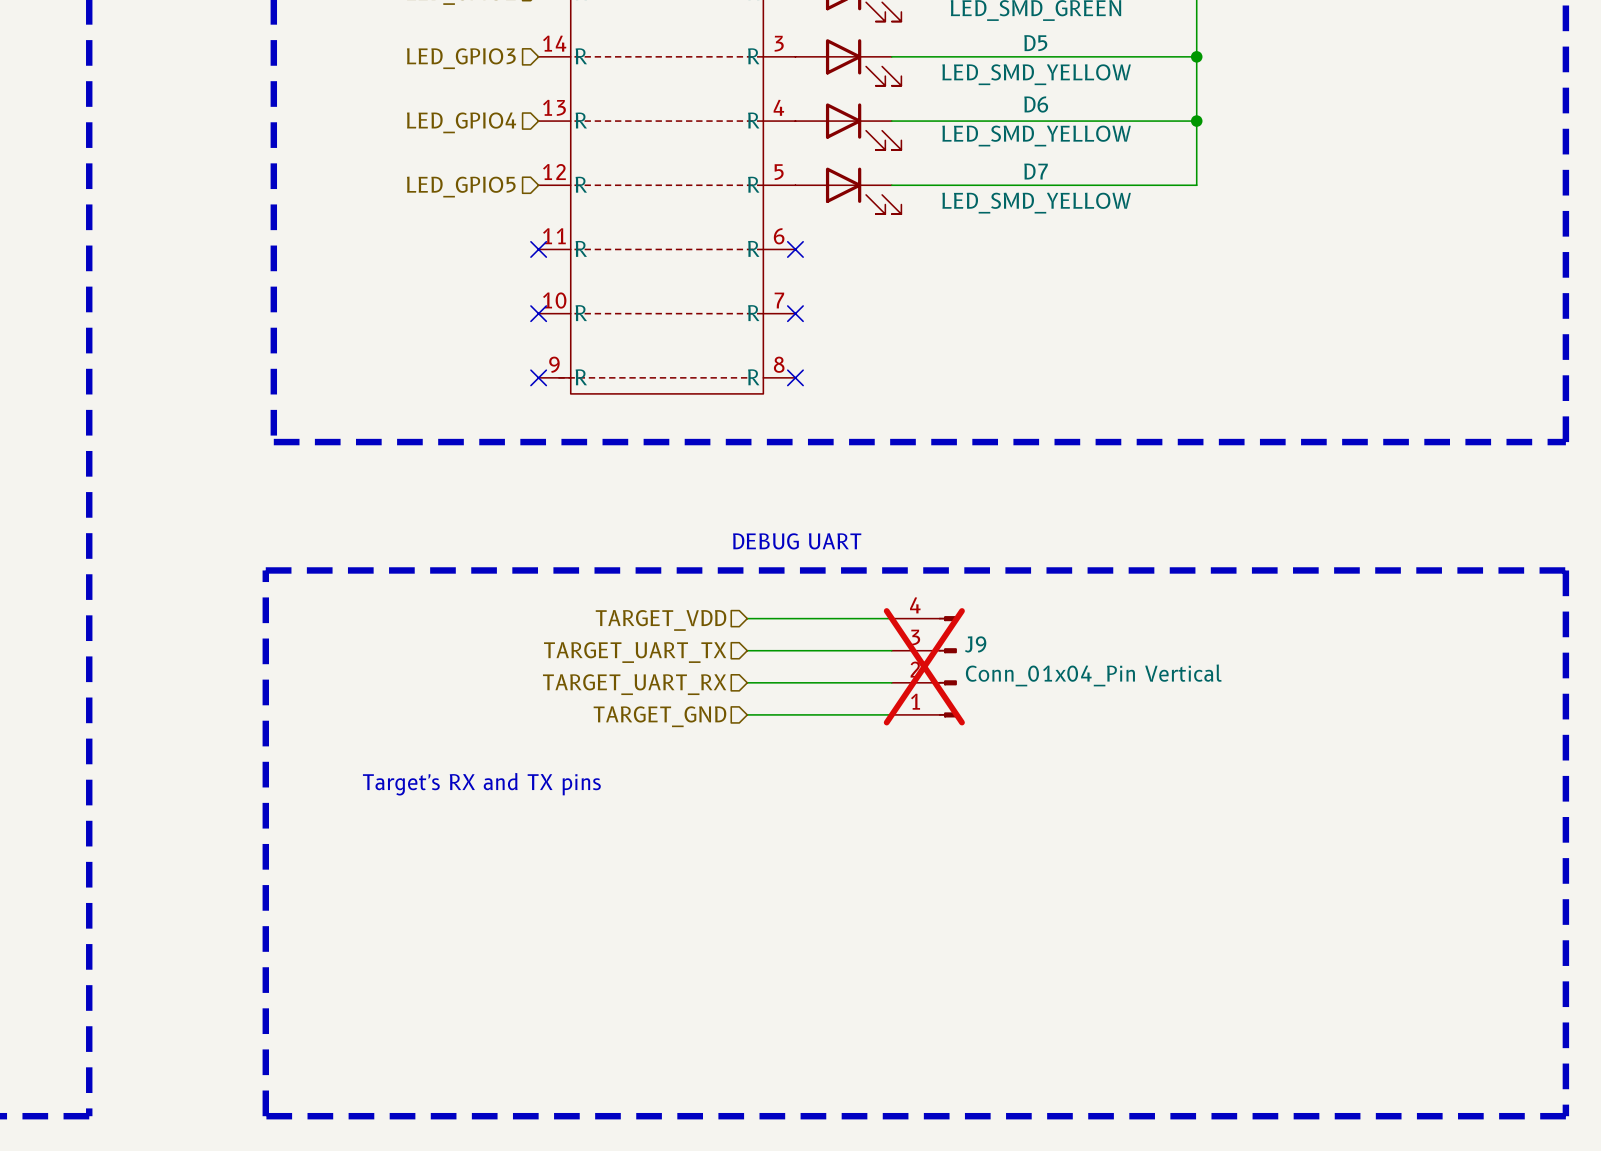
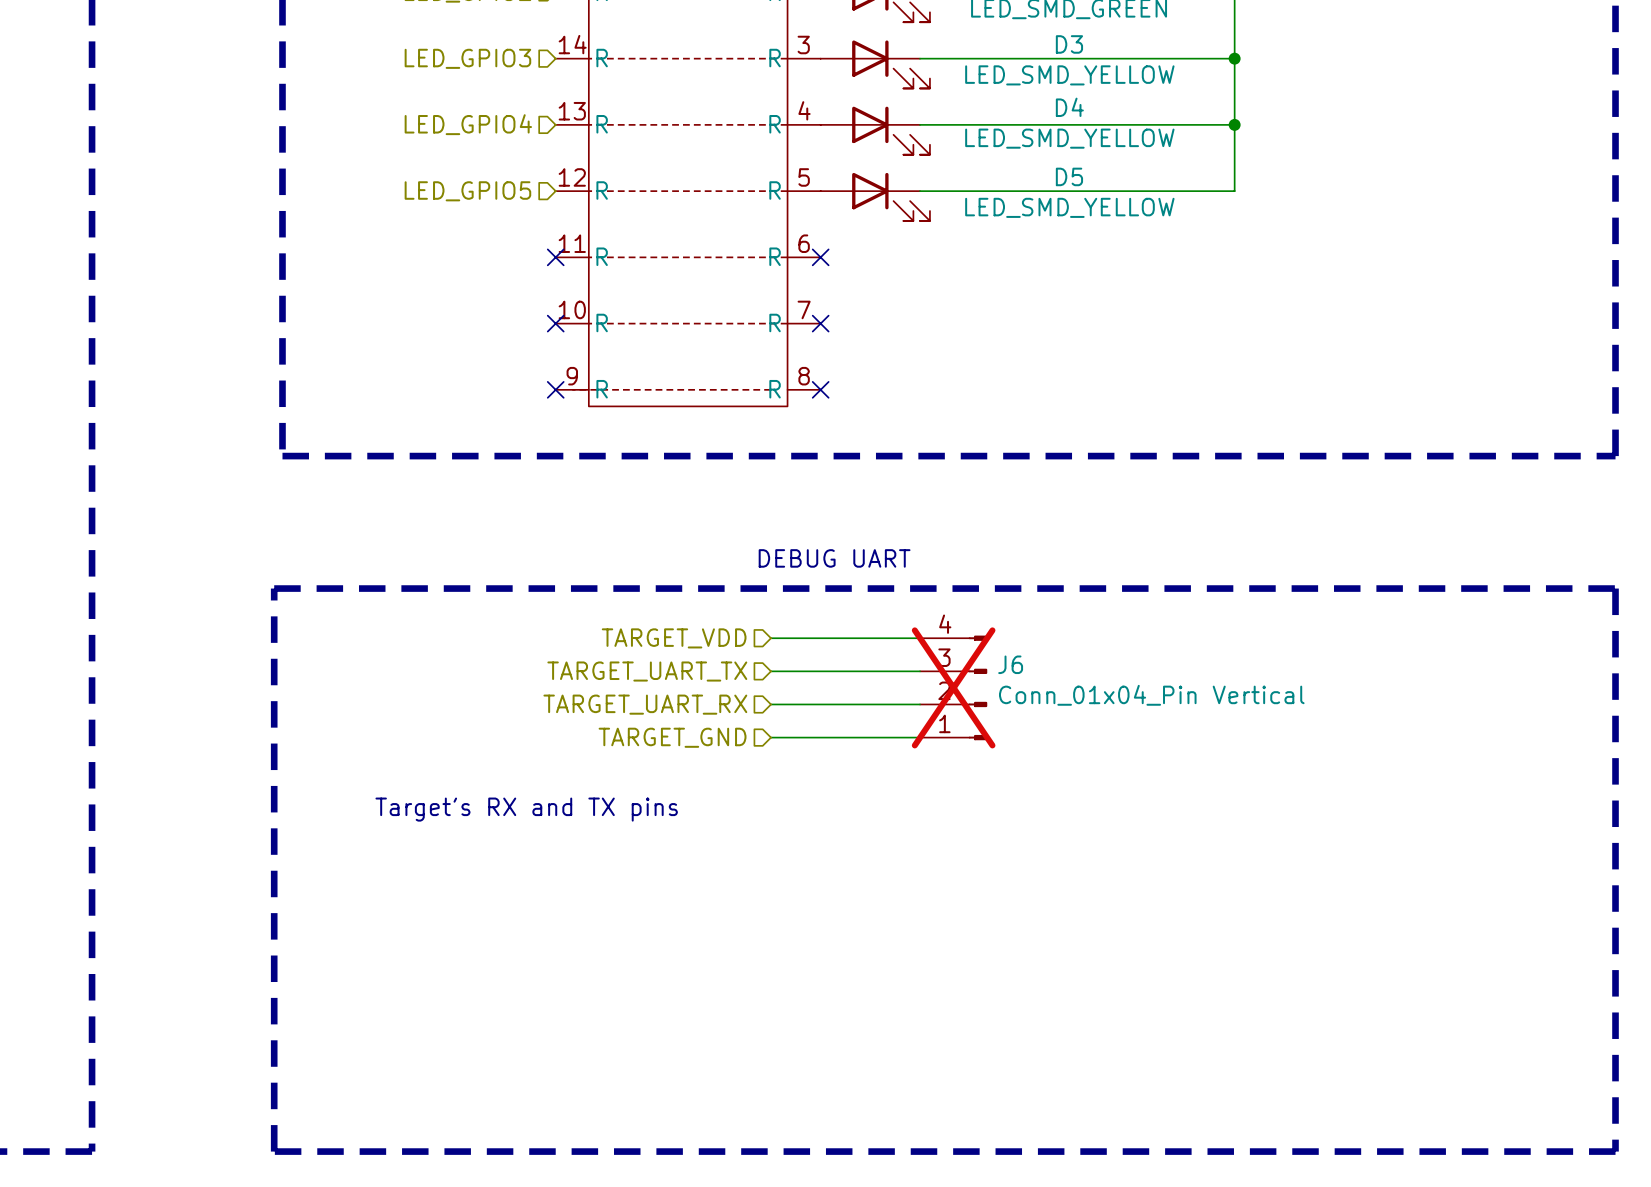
D5 name: D5 (1035, 43) -> D3 (1069, 44)
D6 name: D6 (1036, 104) -> D4 (1069, 107)
D7 name: D7 (1036, 171) -> D5 (1069, 176)
J9 name: J9 (975, 644) -> J6 (1010, 664)

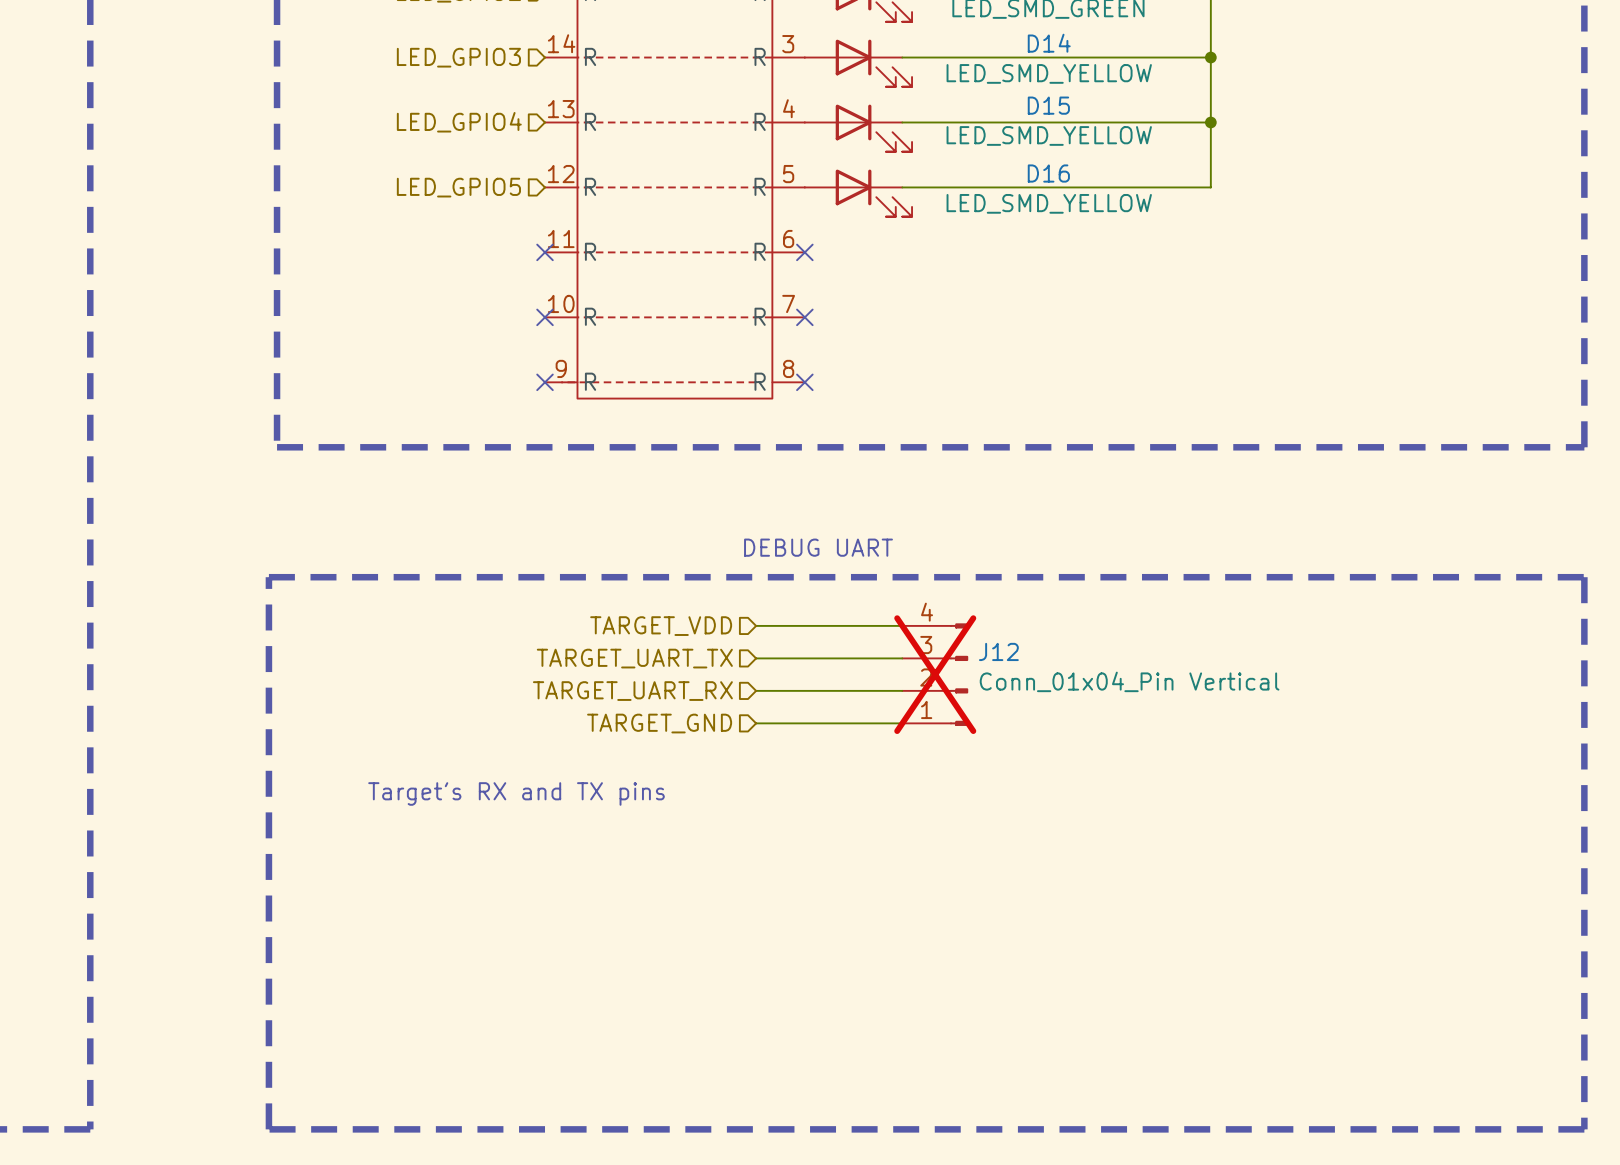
D3 name: D3 (1069, 44) -> D14 (1049, 43)
D4 name: D4 (1069, 107) -> D15 (1048, 105)
D5 name: D5 (1069, 176) -> D16 (1048, 173)
J6 name: J6 (1010, 664) -> J12 (998, 651)

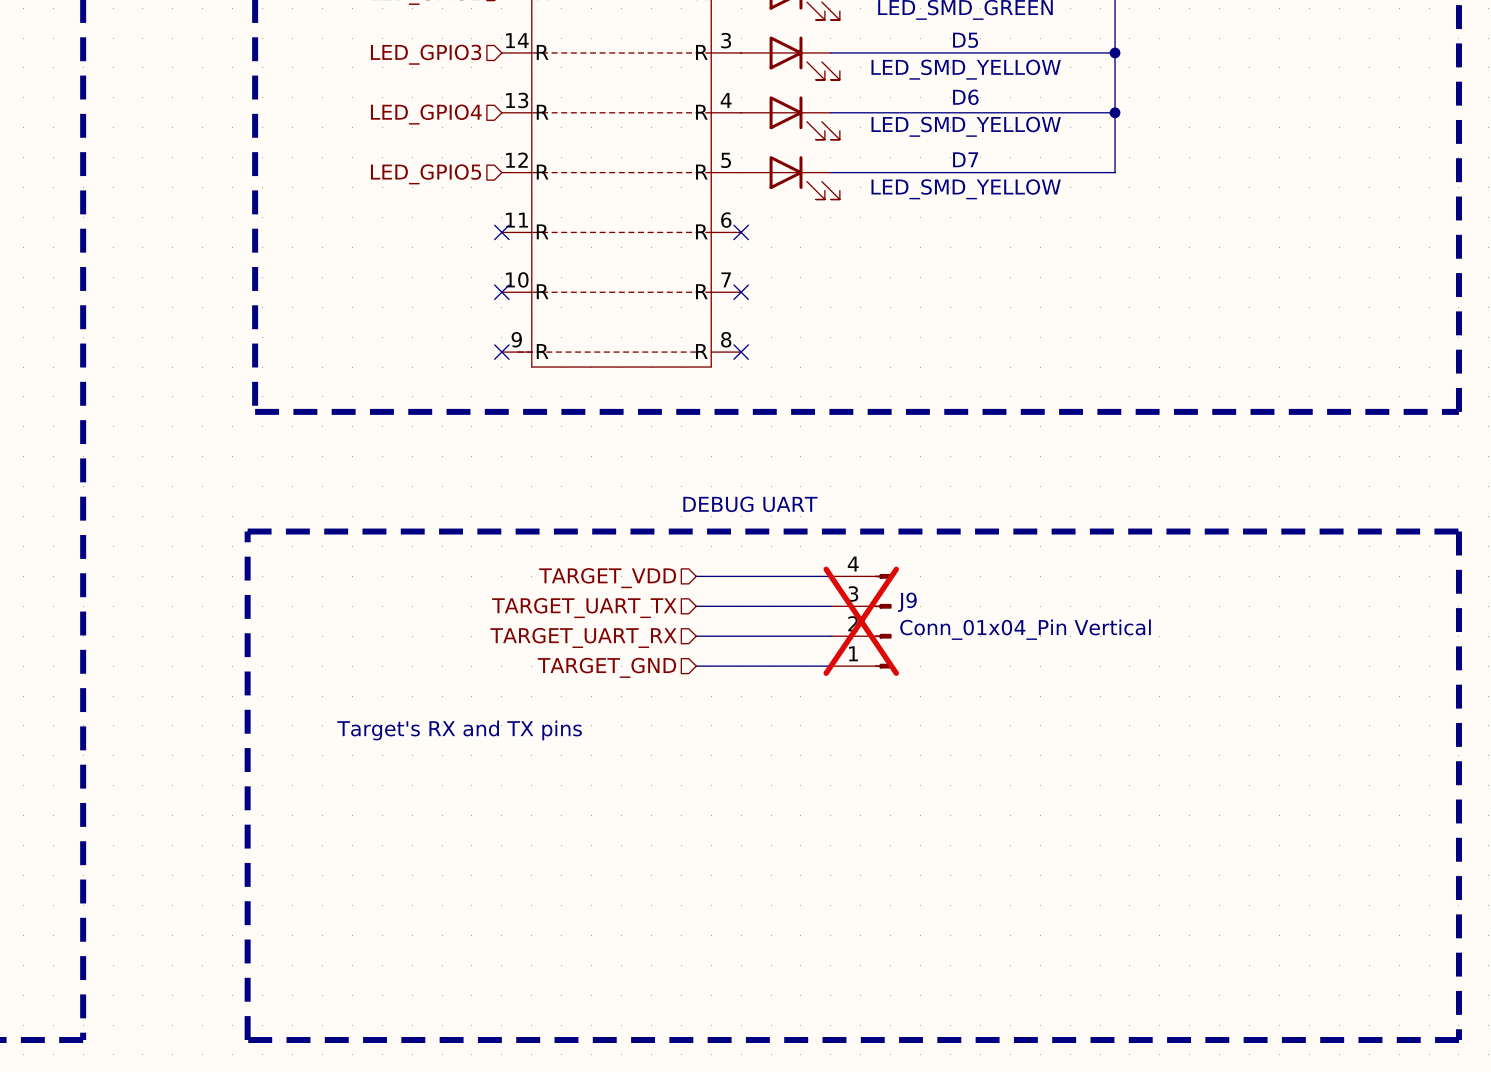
D14 name: D14 (1049, 43) -> D5 (965, 40)
D15 name: D15 (1048, 105) -> D6 (965, 97)
D16 name: D16 (1048, 173) -> D7 (965, 159)
J12 name: J12 (998, 651) -> J9 (907, 602)

